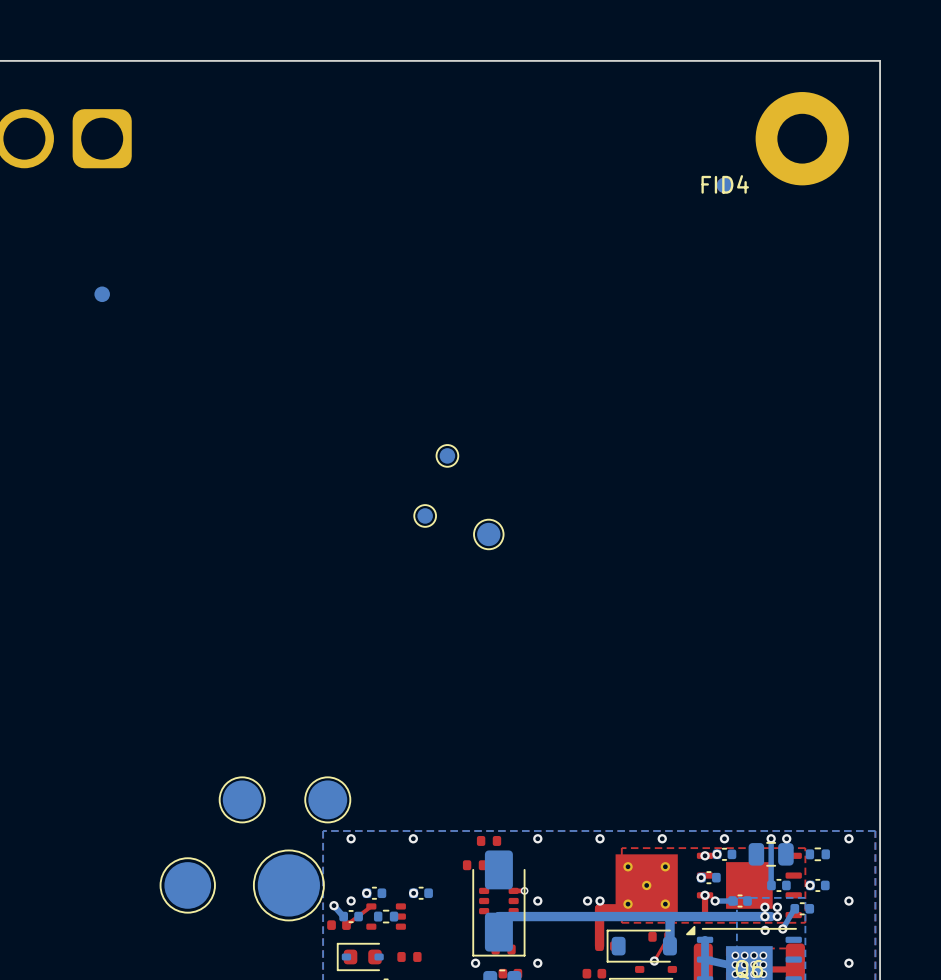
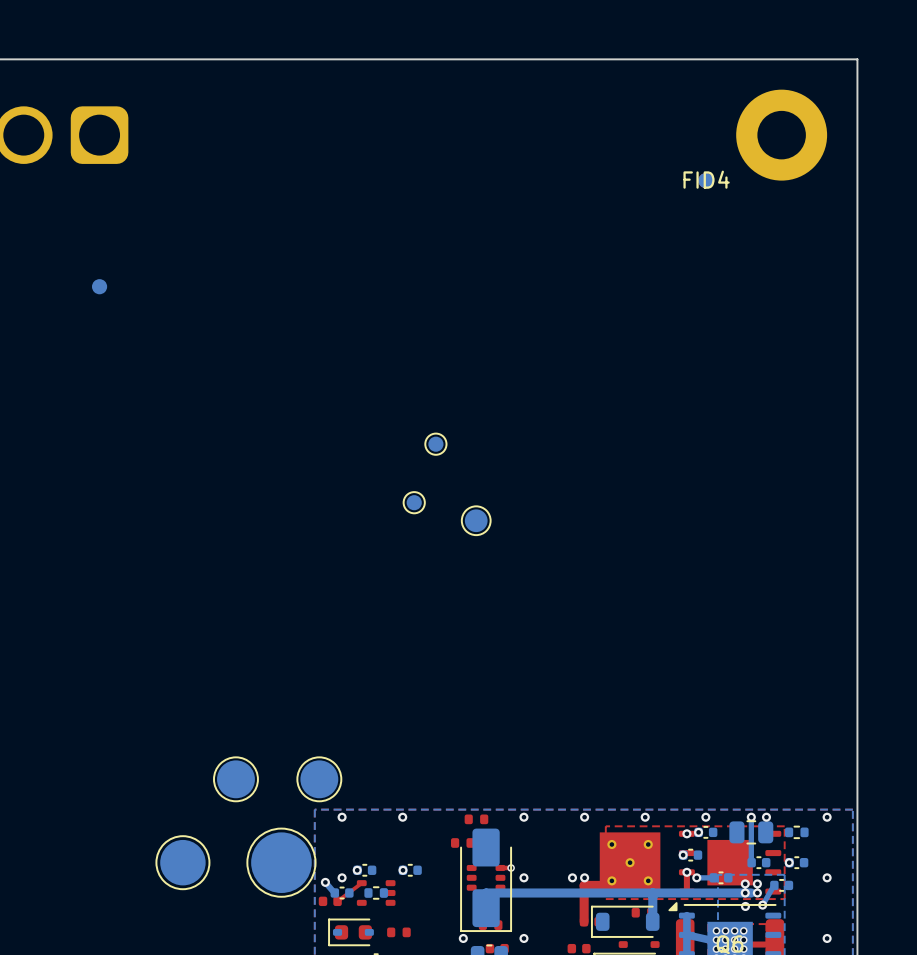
top track: (668, 936) (654, 961) -> none
via: (654, 961) -> none

